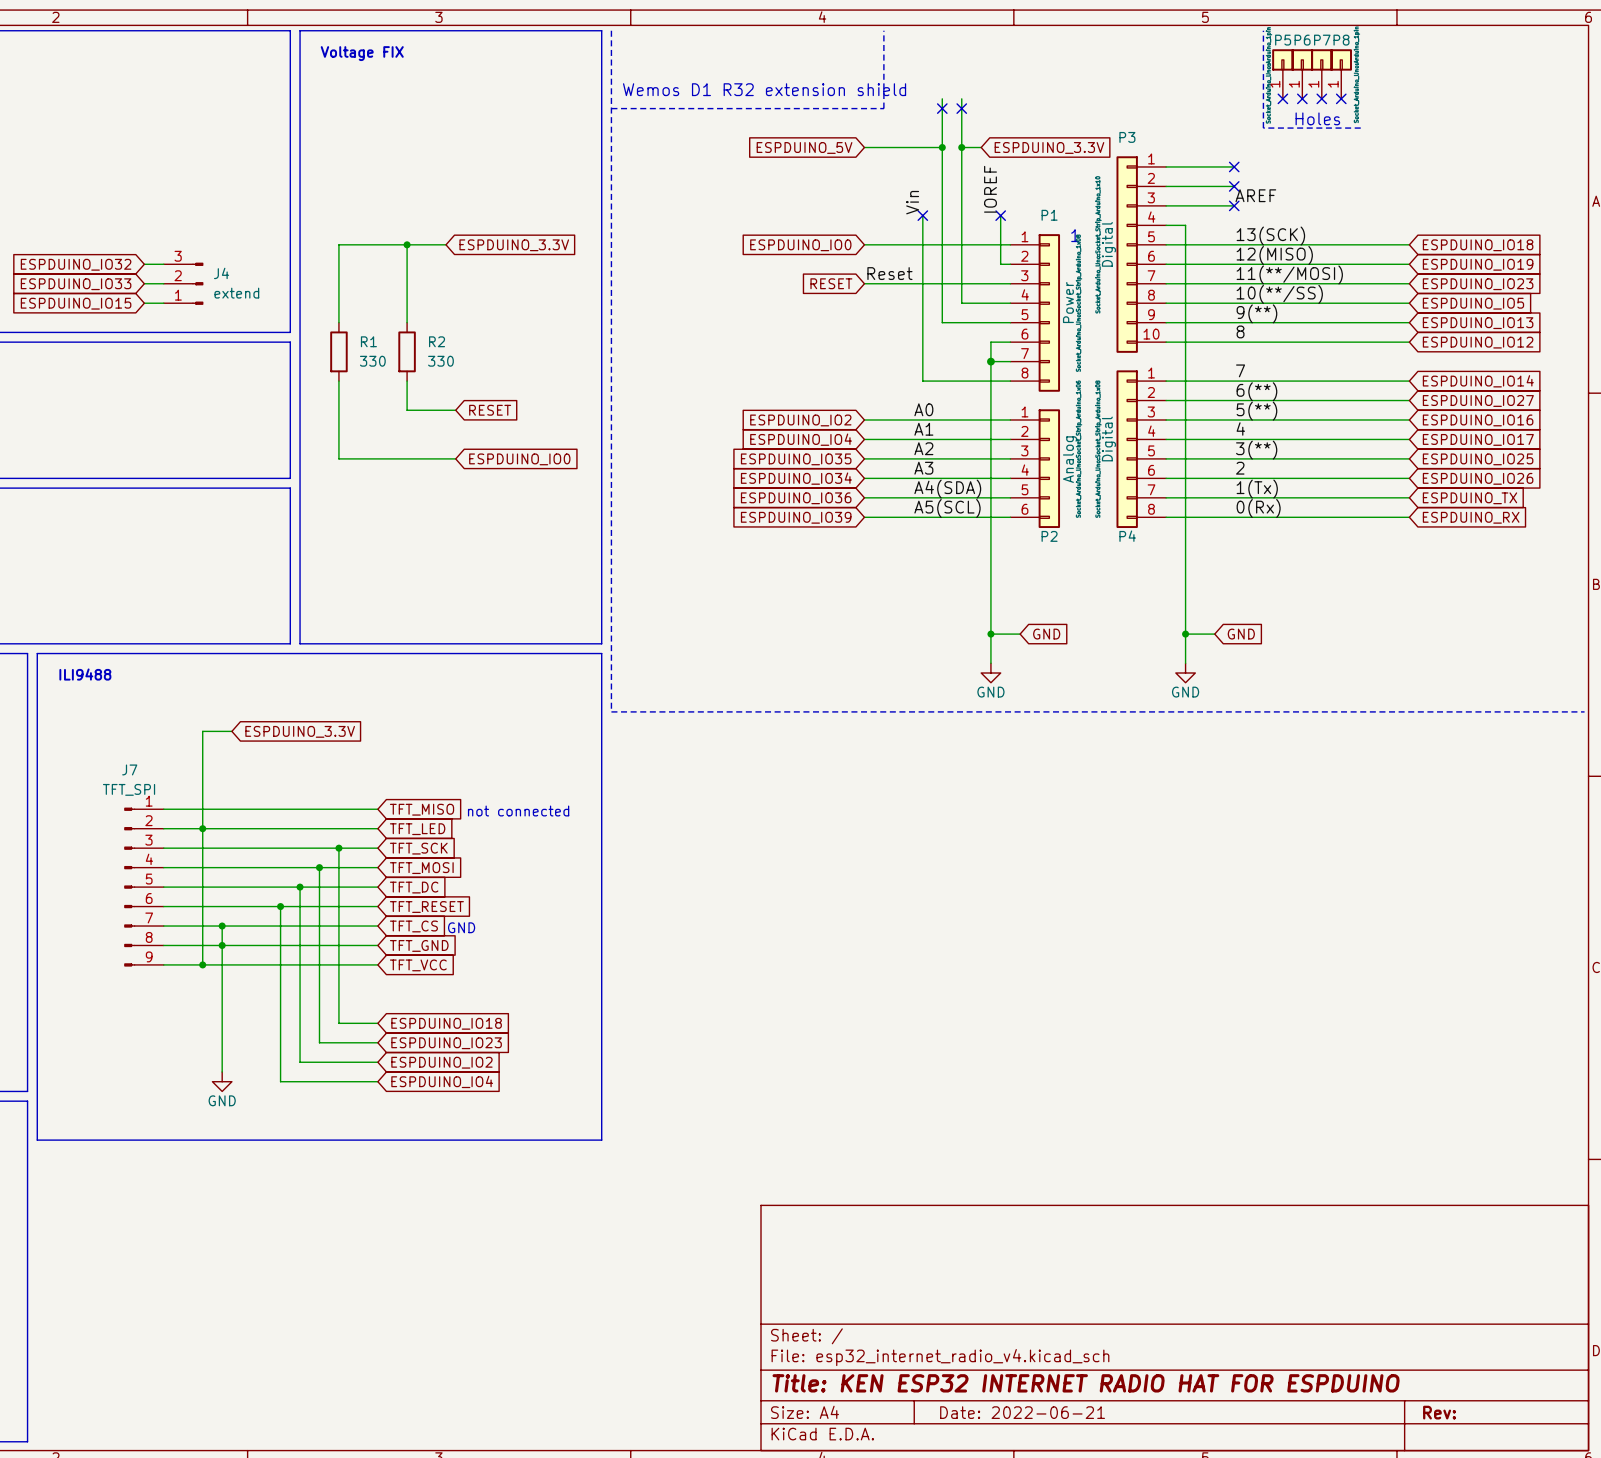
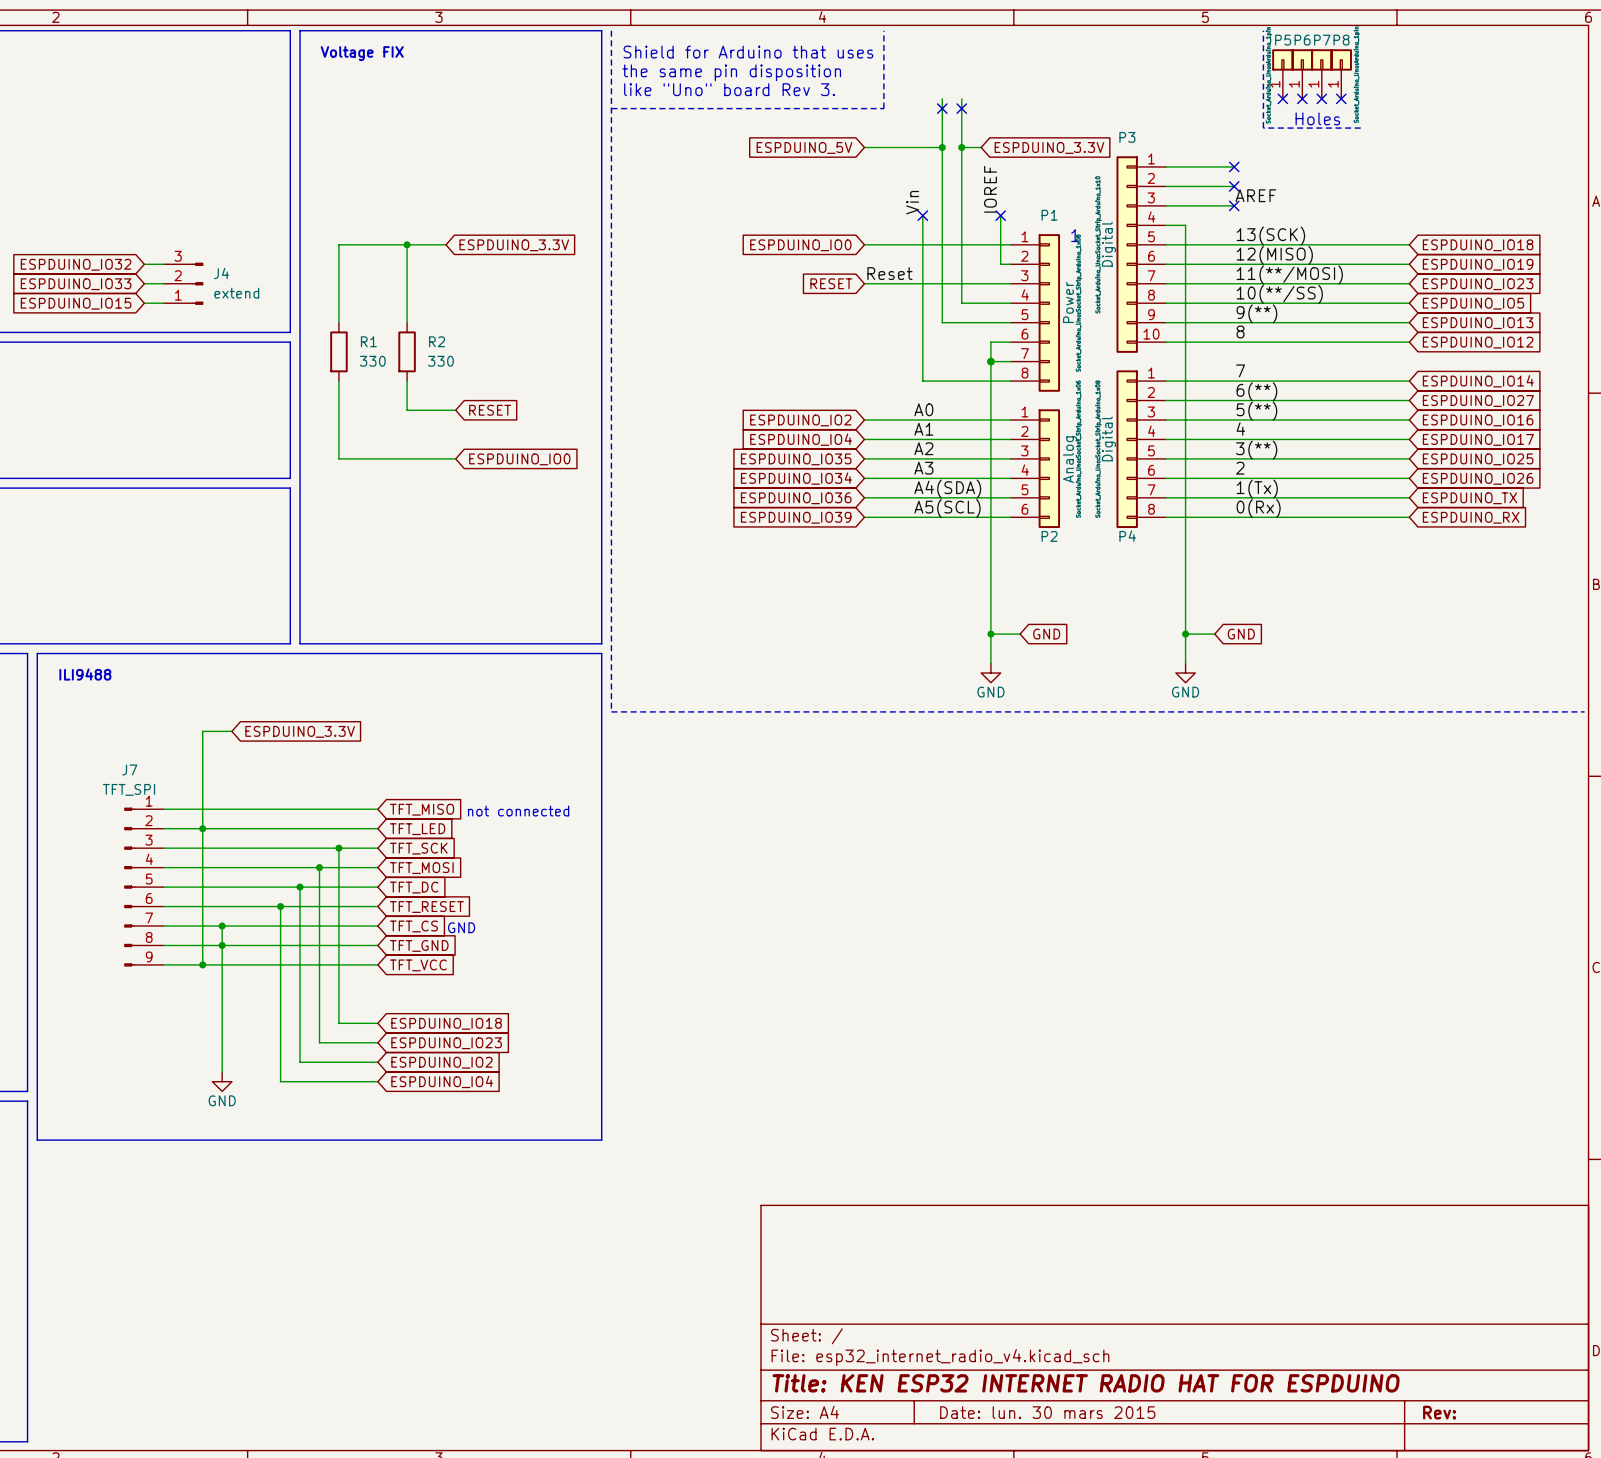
text: none -> Shield for Arduino that uses (748, 52)
text: none -> the same pin disposition (731, 72)
text: Wemos D1 R32 extension shield (764, 89) -> like "Uno" board Rev 3. (729, 89)
title block: Date: 2022-06-21 (1022, 1412) -> Date: lun. 30 mars 2015 (1047, 1412)

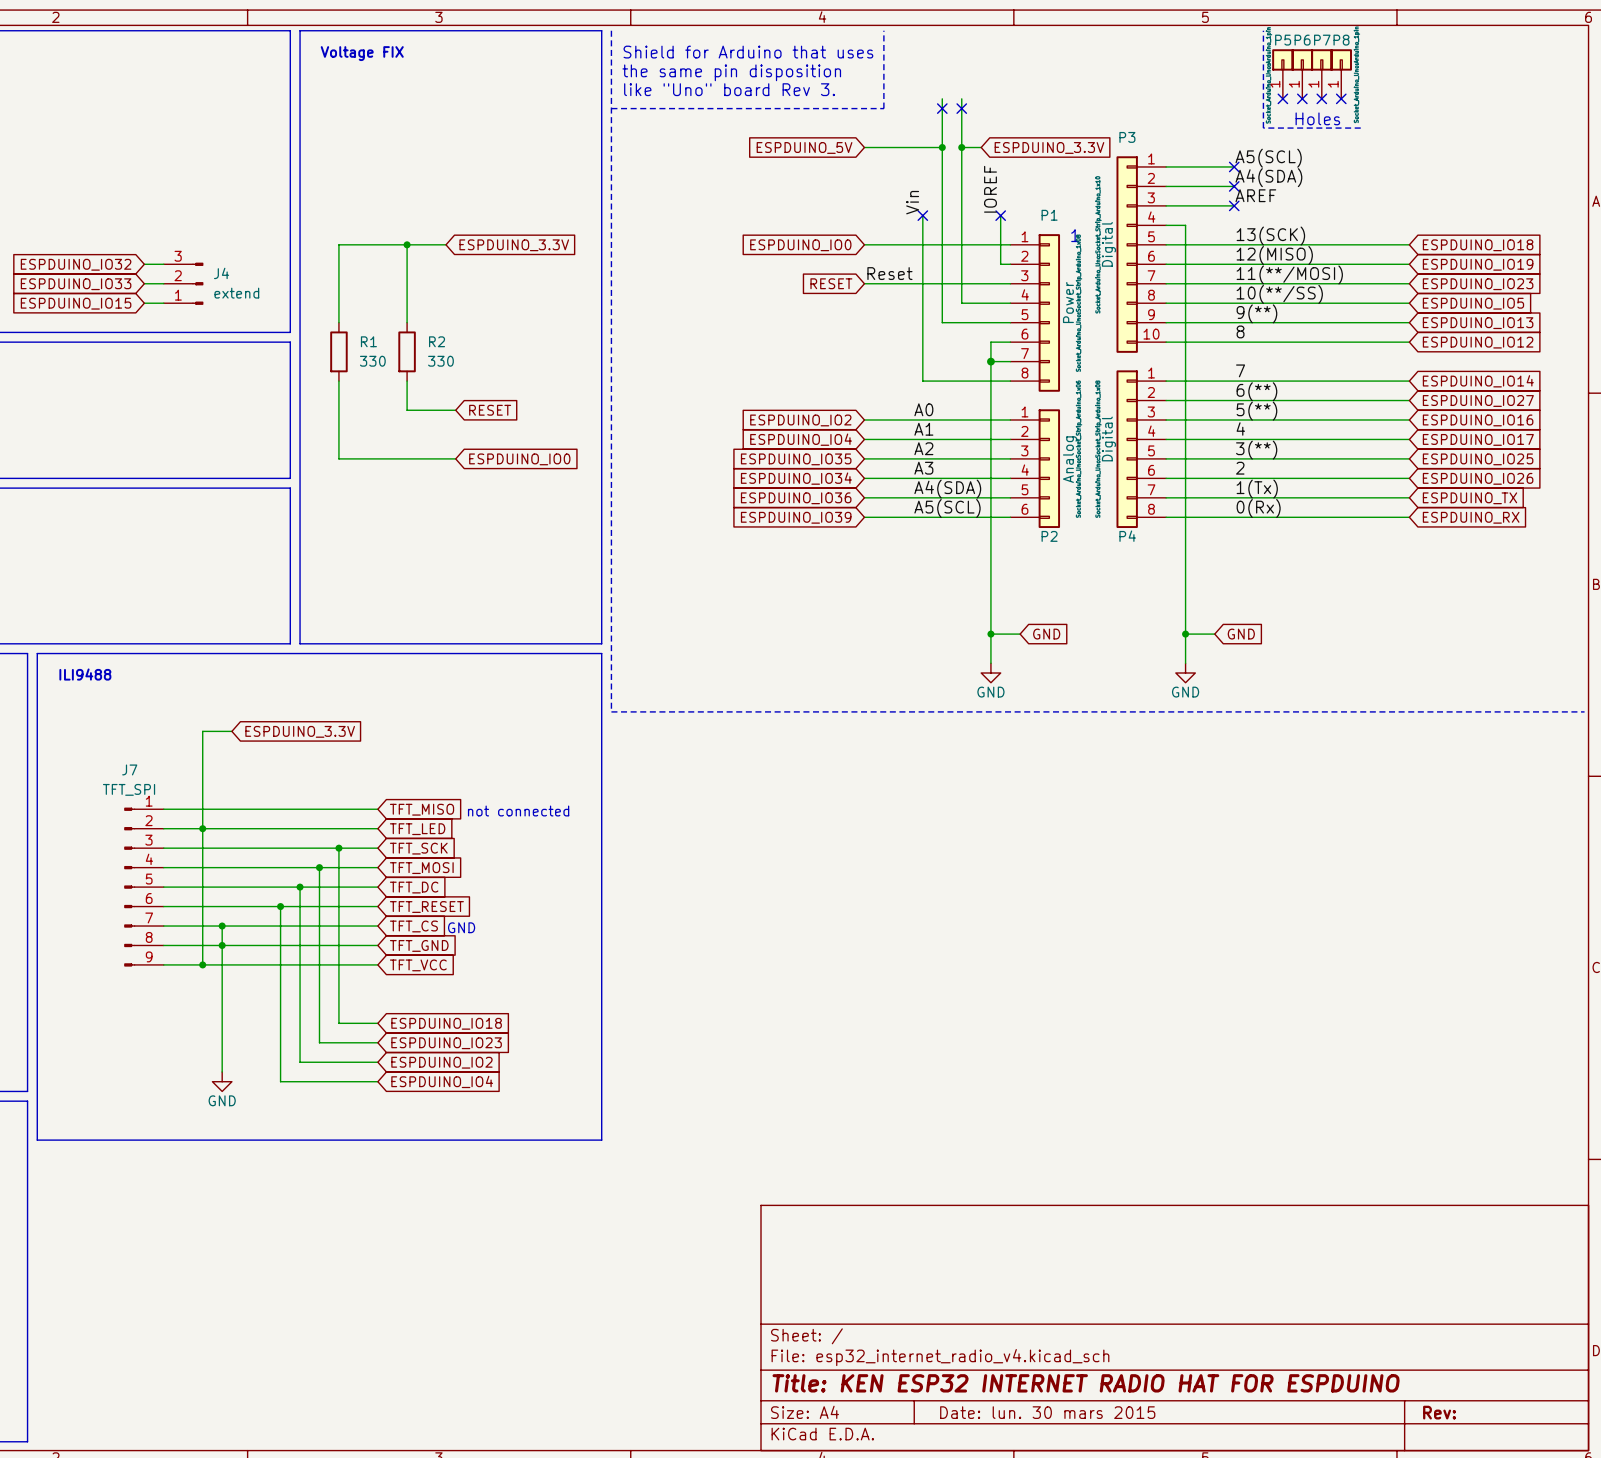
label: none -> A5(SCL) (1268, 158)
label: none -> A4(SDA) (1268, 177)

